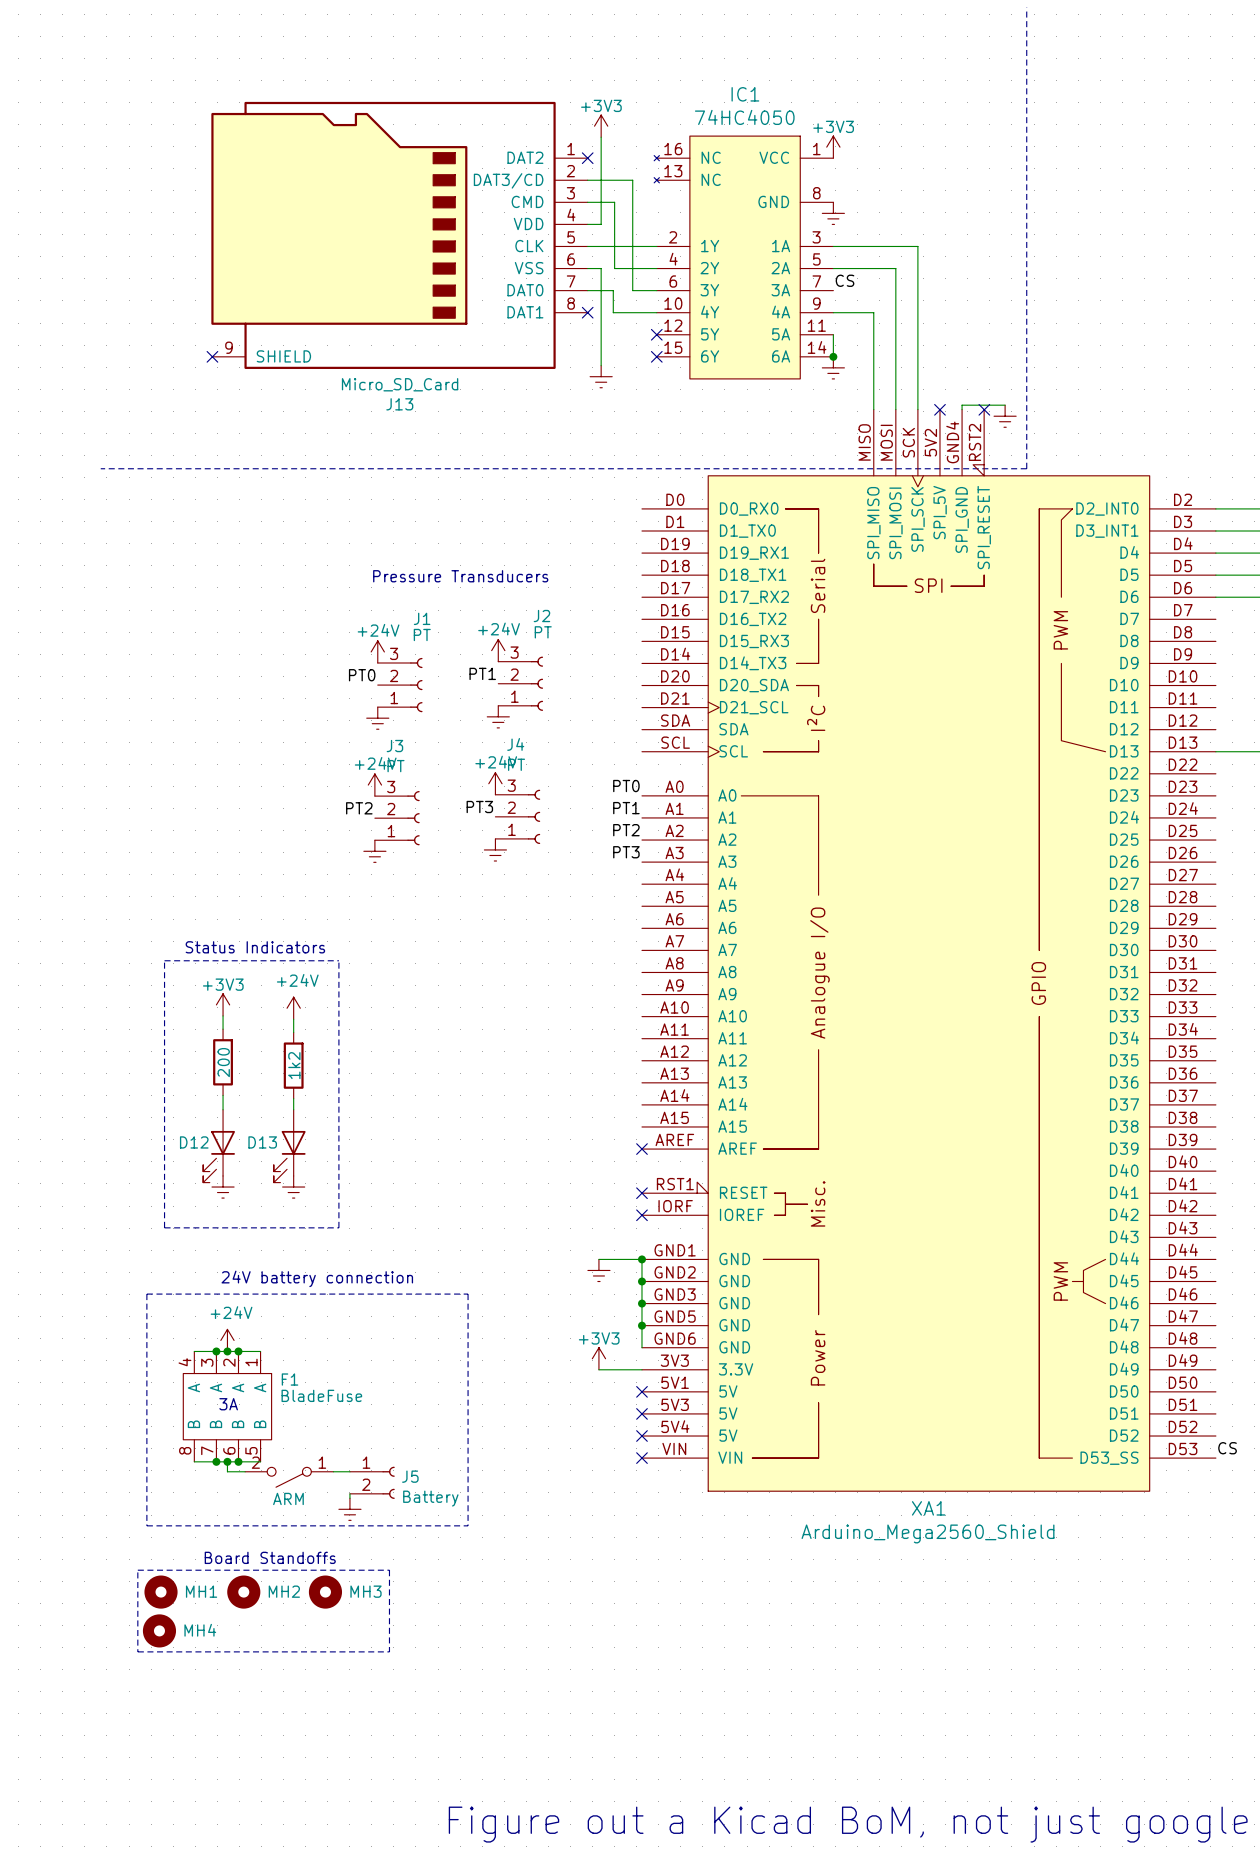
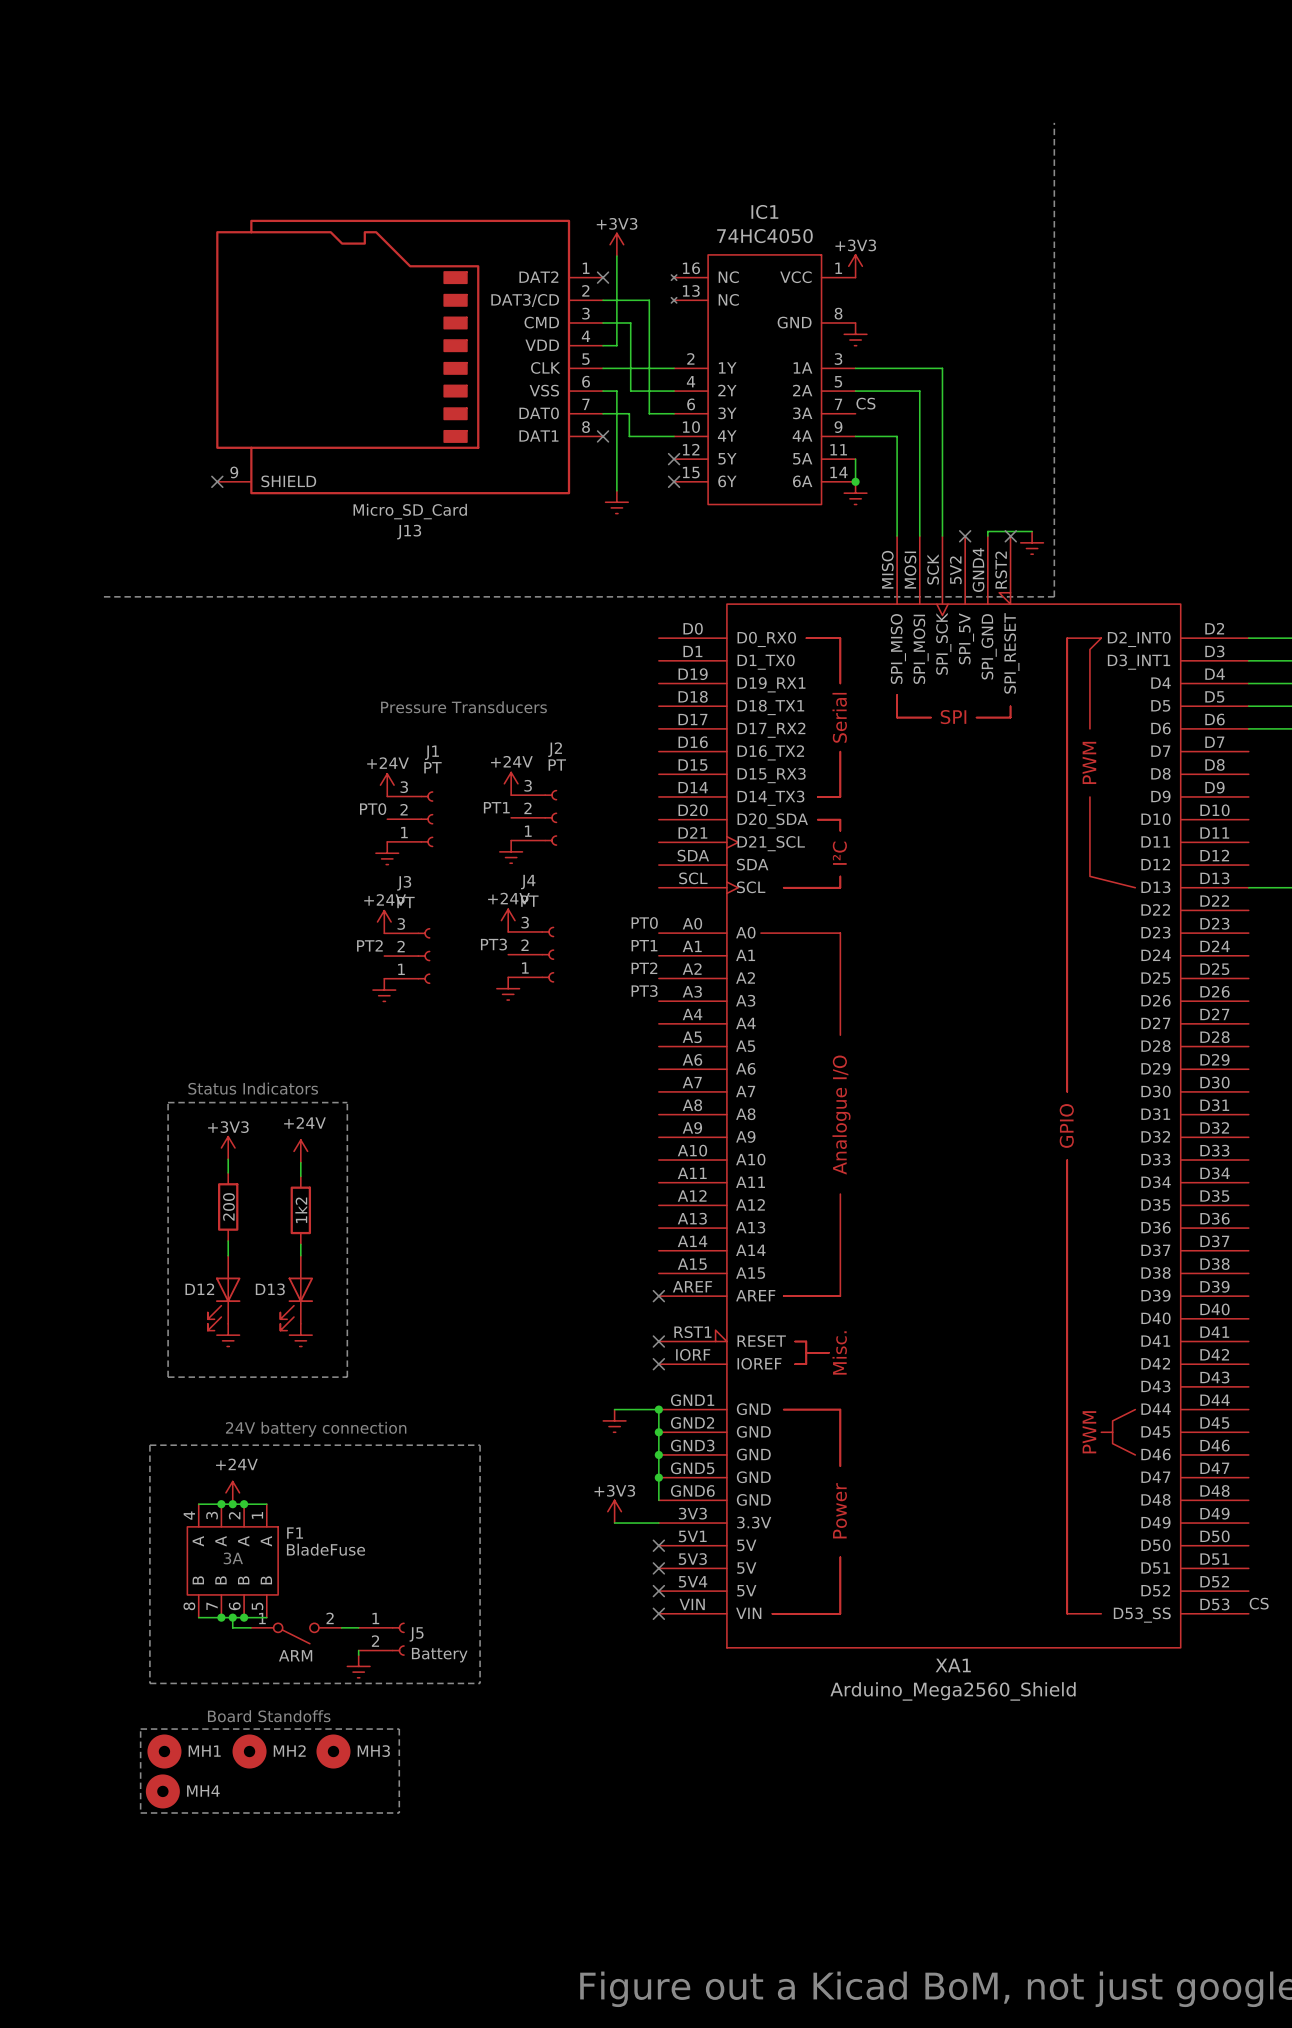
part flip: as is (289, 1477) -> left-right (296, 1633)

